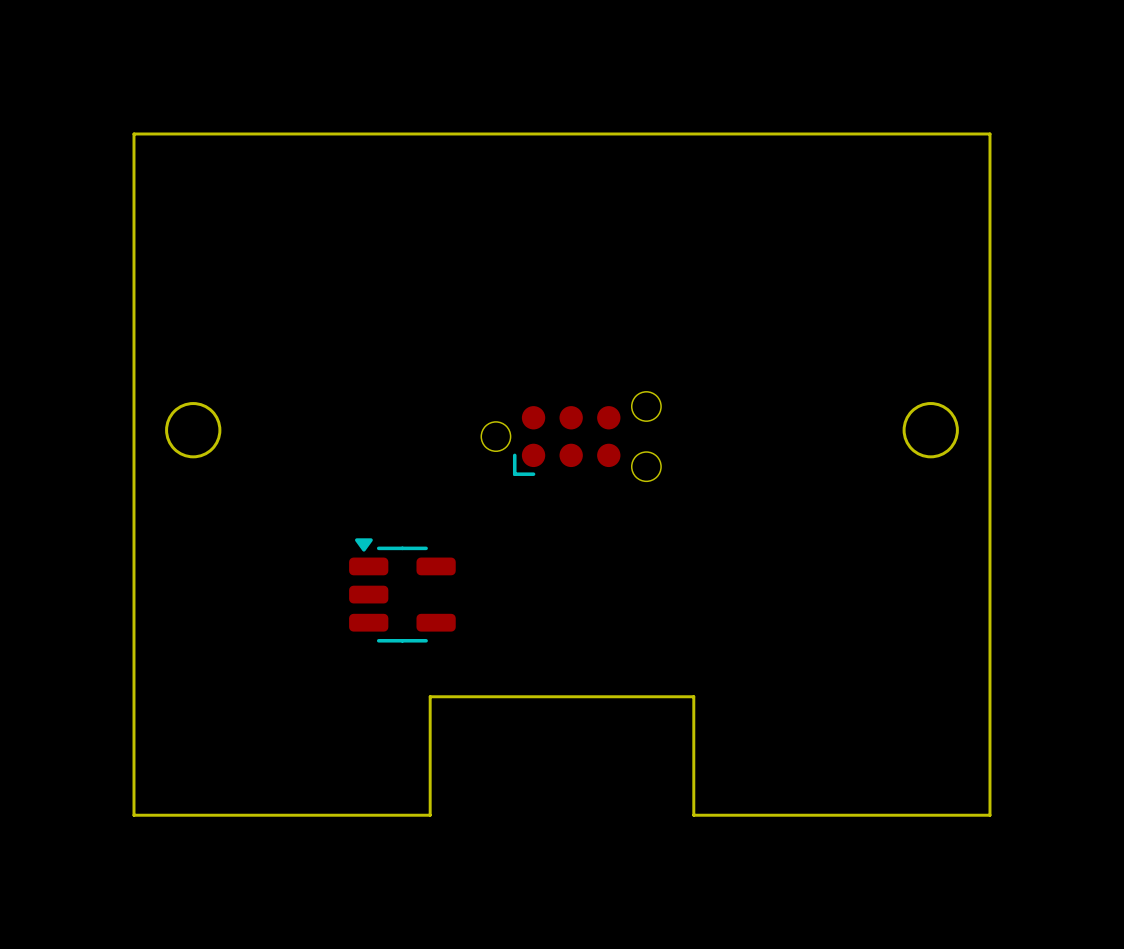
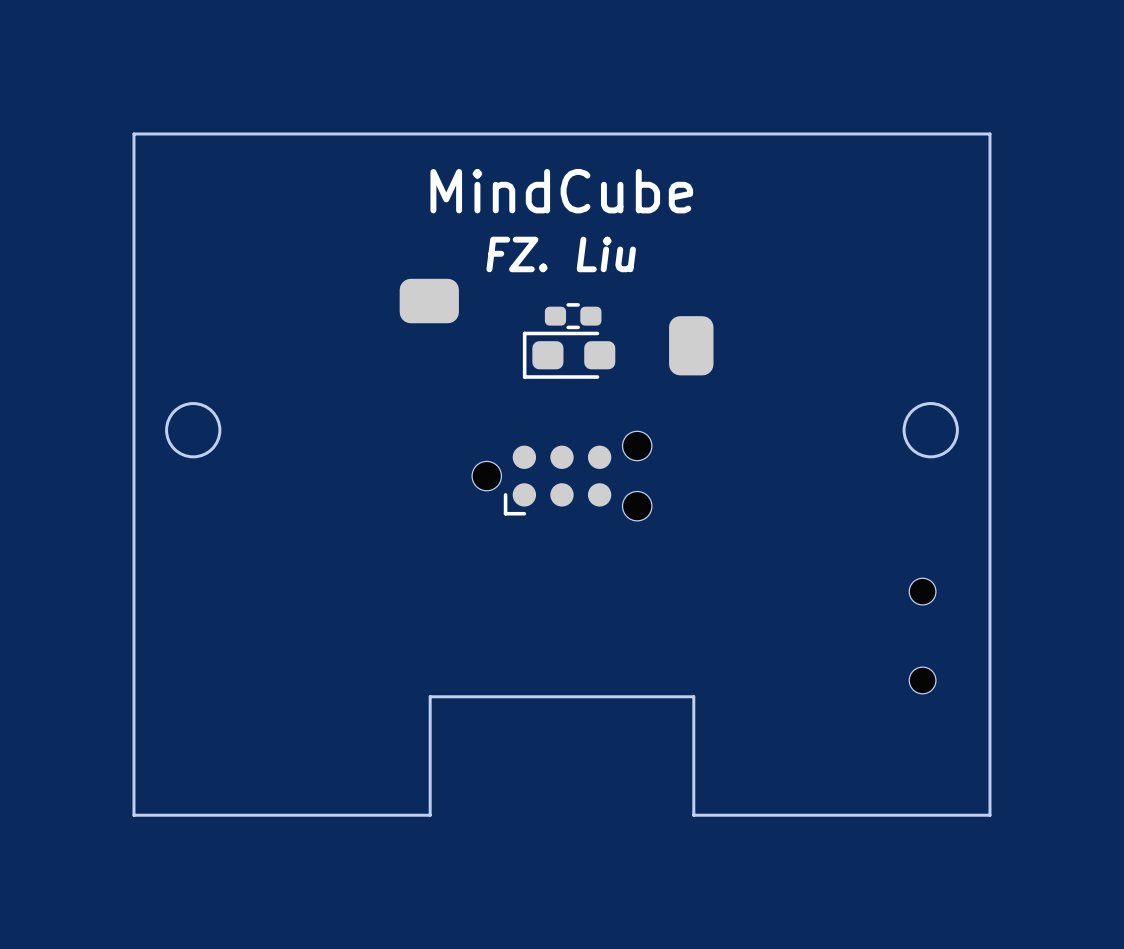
text: none -> MindCube (561, 191)
text: none -> FZ. Liu (561, 254)
part: none -> (429, 301)
part: none -> (573, 316)
part: none -> (691, 345)
part: none -> (569, 355)
part position: (571, 436) -> (561, 476)
part: (402, 590) -> none
part: none -> (922, 636)

